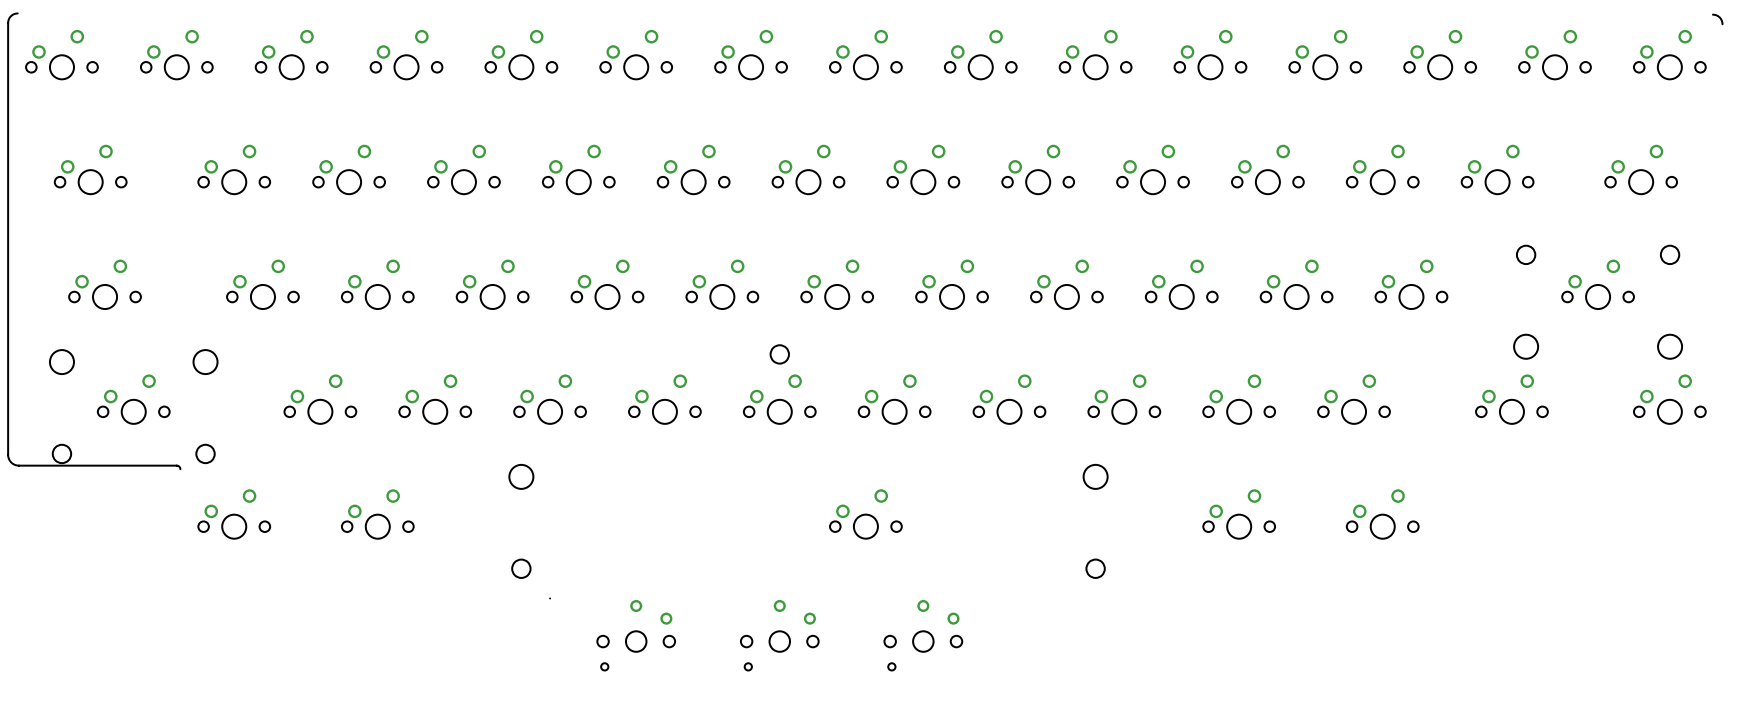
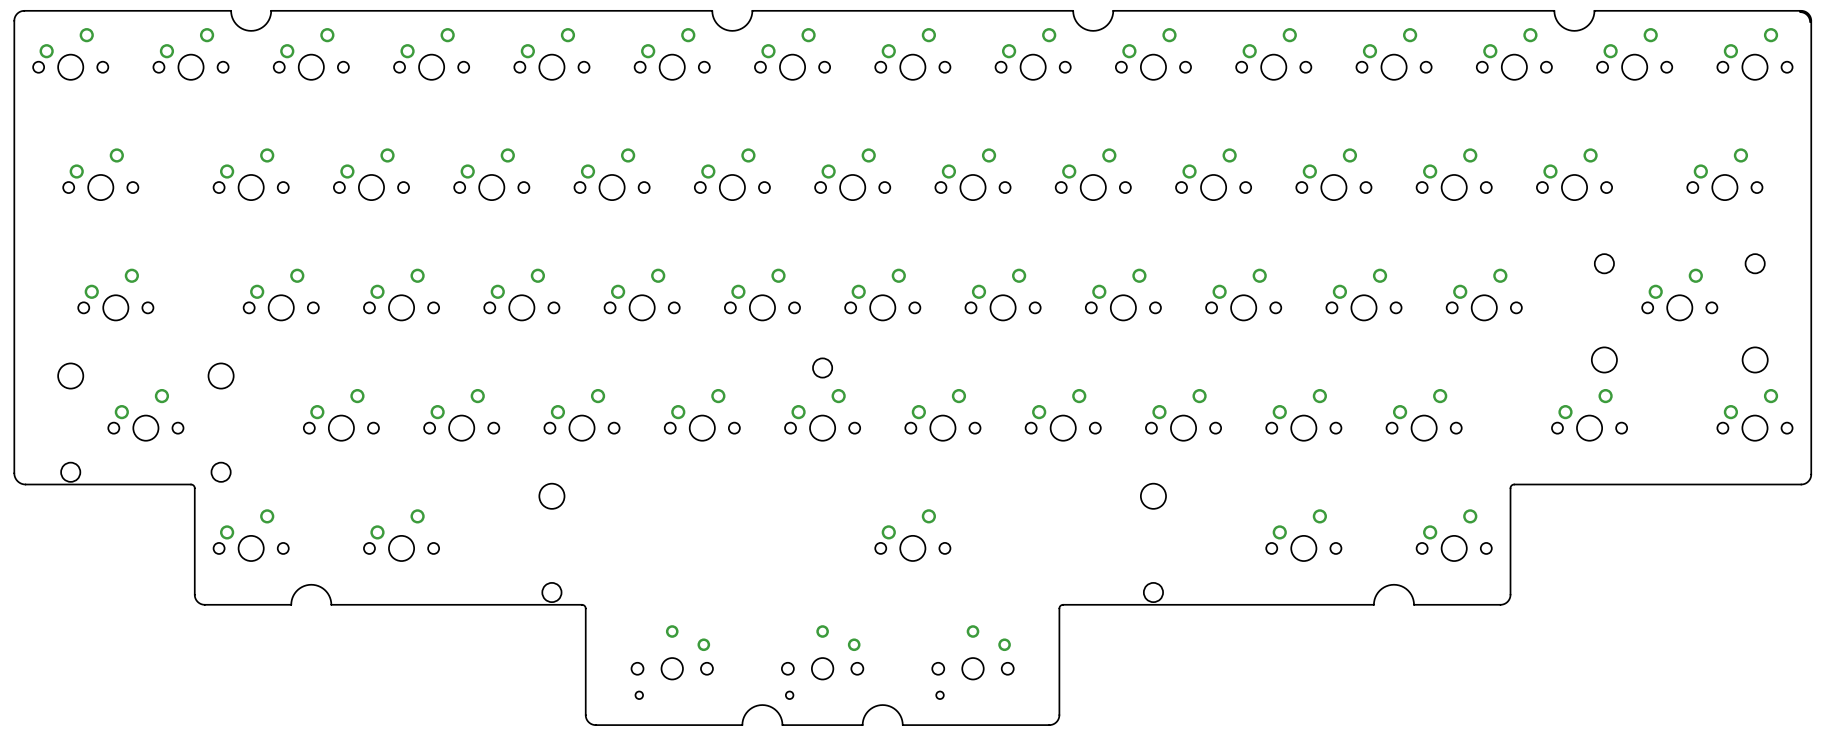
board edge: none -> (24, 10) (231, 10) (233, 20) (237, 25) (251, 30) (264, 25) (269, 17) (271, 10) (712, 10) (713, 18) (718, 25) (724, 29) (732, 30) (740, 29) (746, 25) (750, 18) (752, 10) (1073, 10) (1074, 18) (1079, 25) (1085, 29) (1093, 30) (1100, 29) (1107, 25) (1111, 18) (1113, 10) (1554, 10) (1555, 18) (1560, 25) (1566, 29) (1574, 30) (1582, 29) (1588, 25) (1592, 18) (1594, 10) (1801, 10) (1807, 12) (1810, 18) (1809, 479) (1801, 484) (1513, 484) (1510, 488) (1510, 596) (1507, 601) (1503, 604) (1414, 604) (1412, 597) (1408, 590) (1401, 586) (1393, 584) (1386, 586) (1379, 590) (1375, 597) (1373, 604) (1062, 604) (1059, 608) (1059, 716) (1056, 722) (1050, 725) (902, 725) (900, 715) (896, 710) (882, 705) (875, 706) (867, 711) (862, 725) (782, 725) (780, 717) (776, 710) (770, 706) (762, 705) (754, 706) (748, 710) (743, 717) (742, 725) (594, 725) (588, 722) (585, 716) (585, 608) (583, 605) (331, 604) (326, 591) (320, 587) (311, 584) (298, 589) (292, 597) (291, 604) (202, 604) (196, 600) (194, 594) (194, 488)

